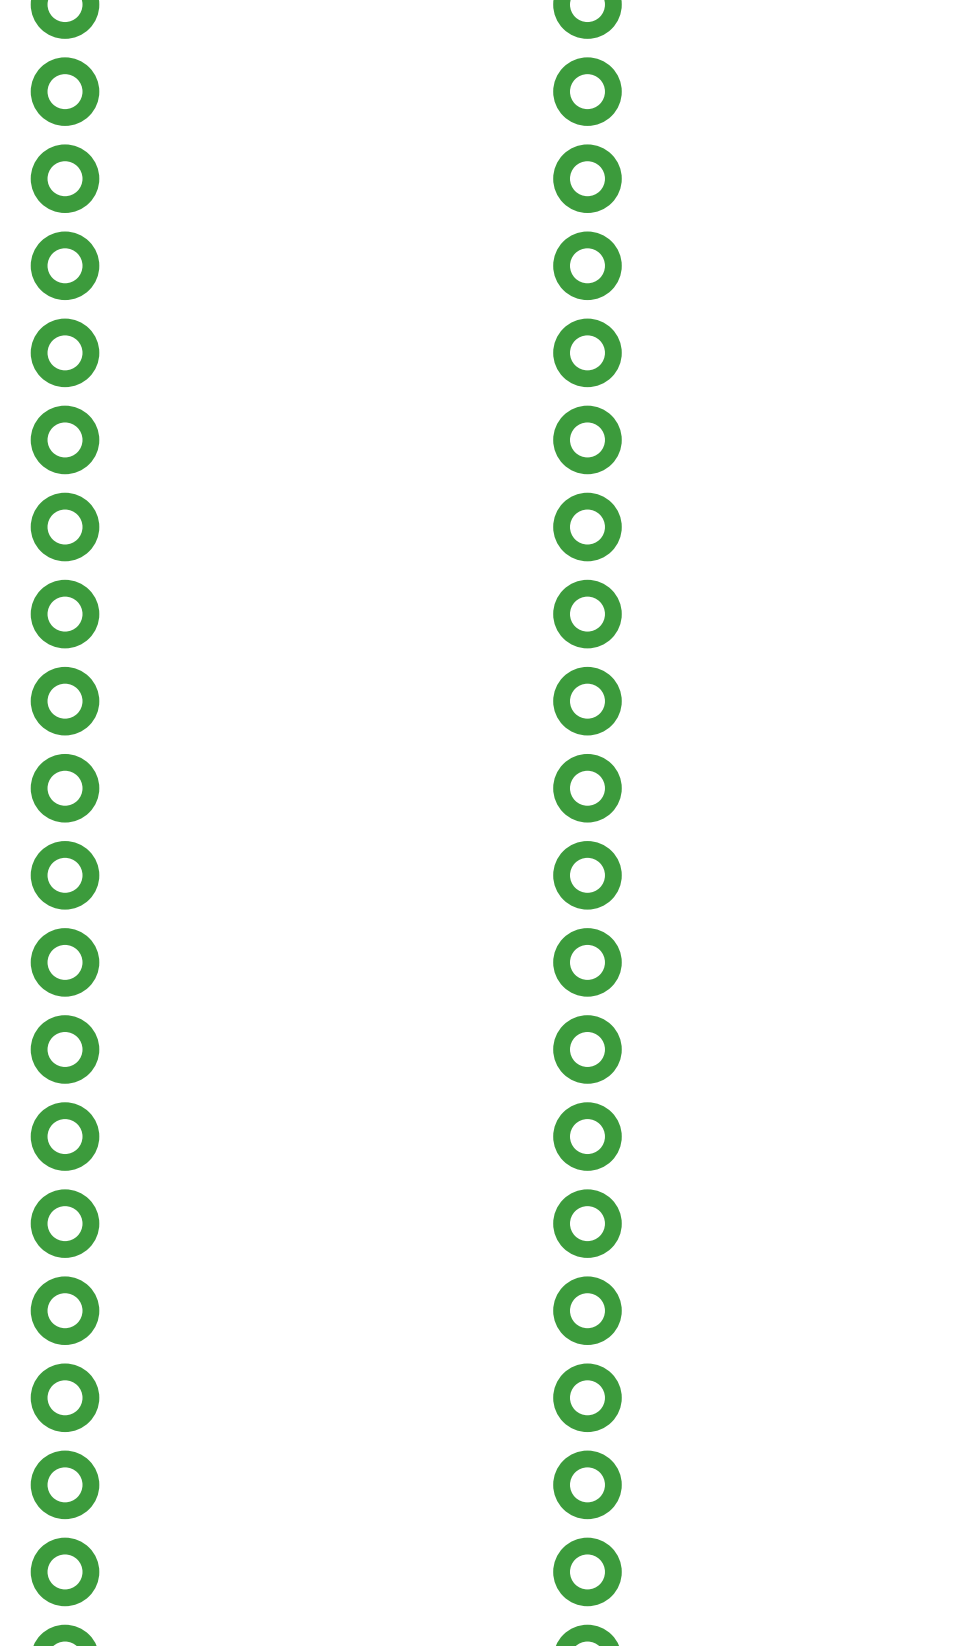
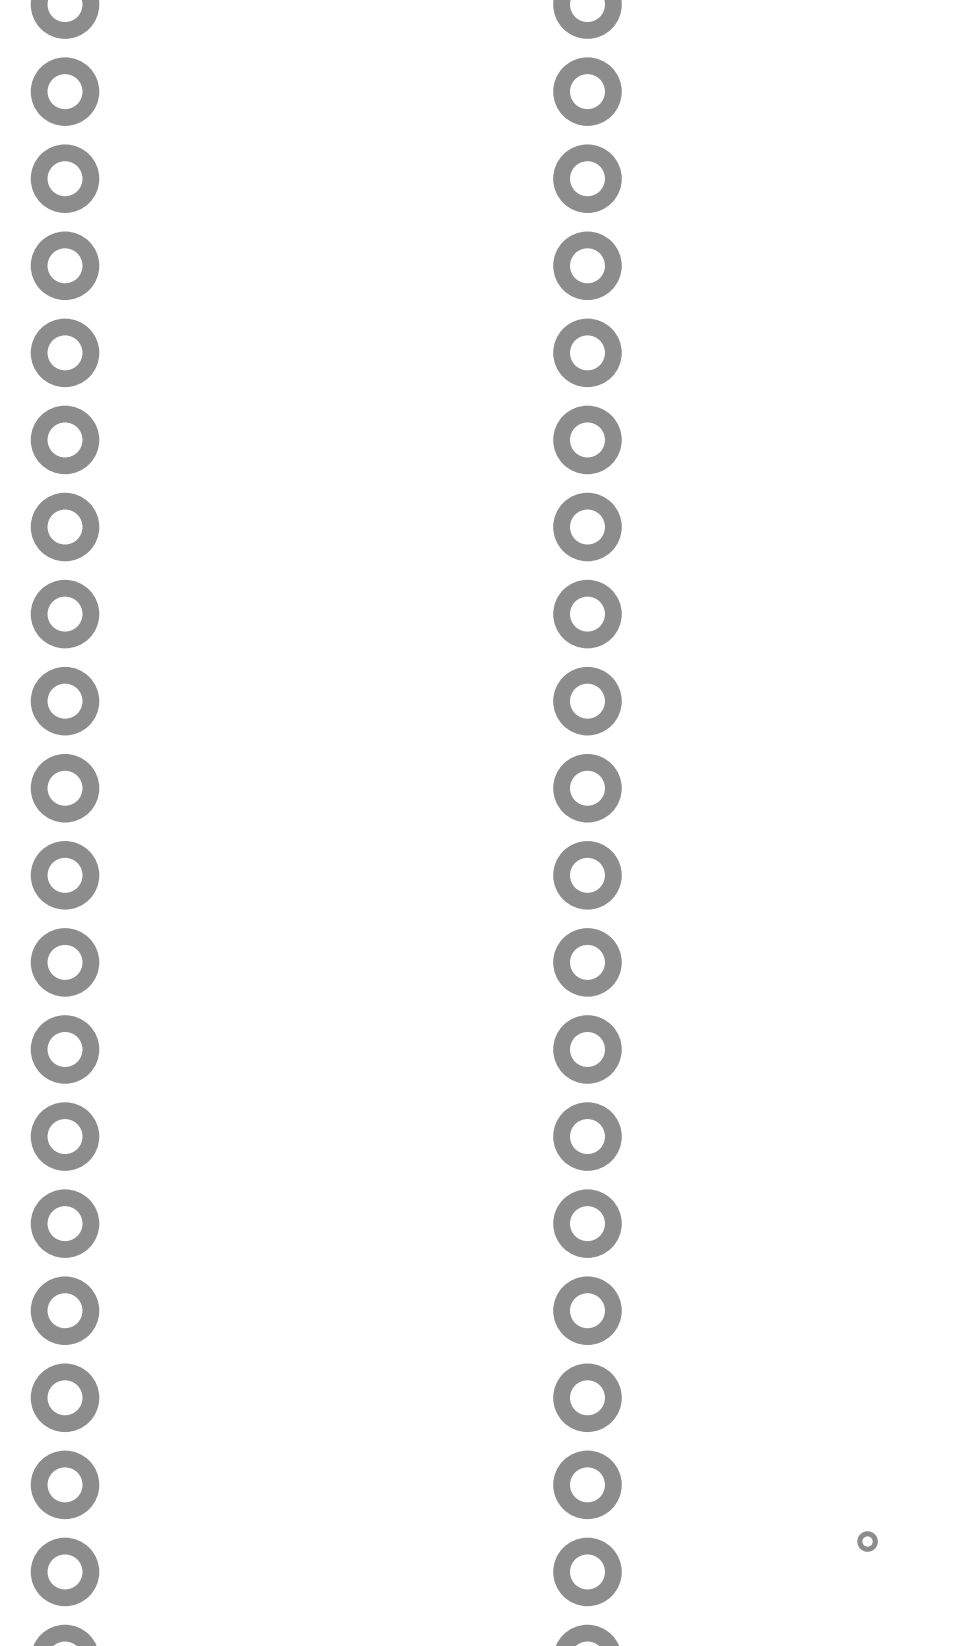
via: none -> (867, 1541)

